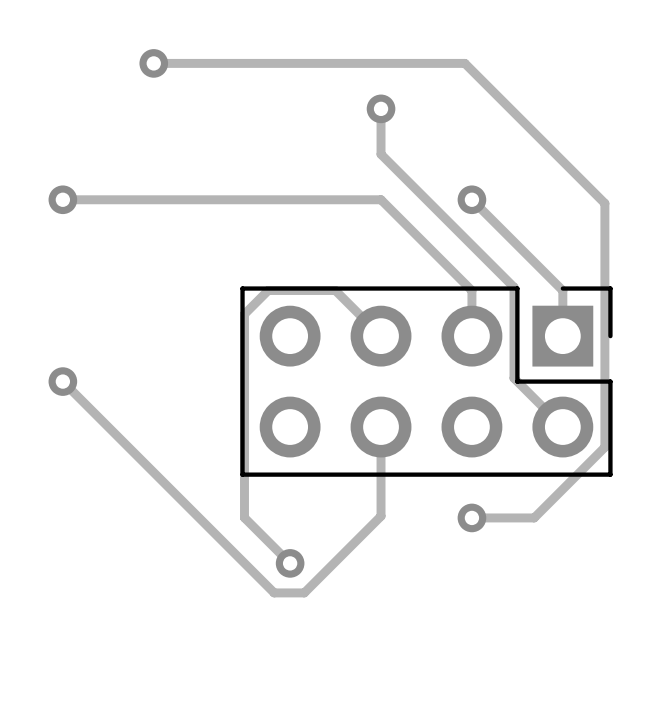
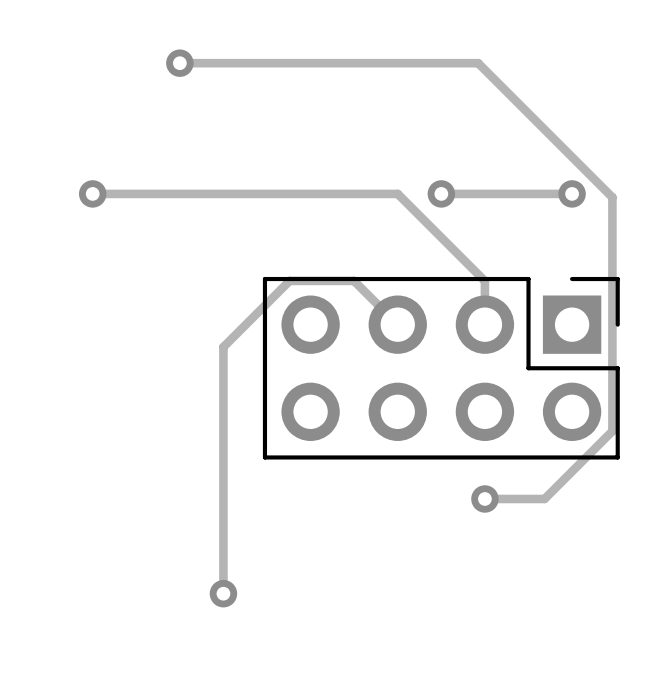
track: (381, 108) (381, 154) (513, 287) (513, 378) (562, 427) -> none
via: (381, 108) -> none
via: none -> (441, 193)
track: (471, 199) (562, 290) (562, 336) -> none
via: (471, 199) -> none
track: none -> (572, 193) (441, 193)
via: none -> (572, 193)
track: (244, 314) (244, 517) (290, 563) -> (266, 303) (223, 347) (223, 593)
track: (62, 381) (274, 592) (304, 592) (381, 516) (381, 427) -> none
via: (62, 381) -> none
via position: (290, 563) -> (223, 593)

